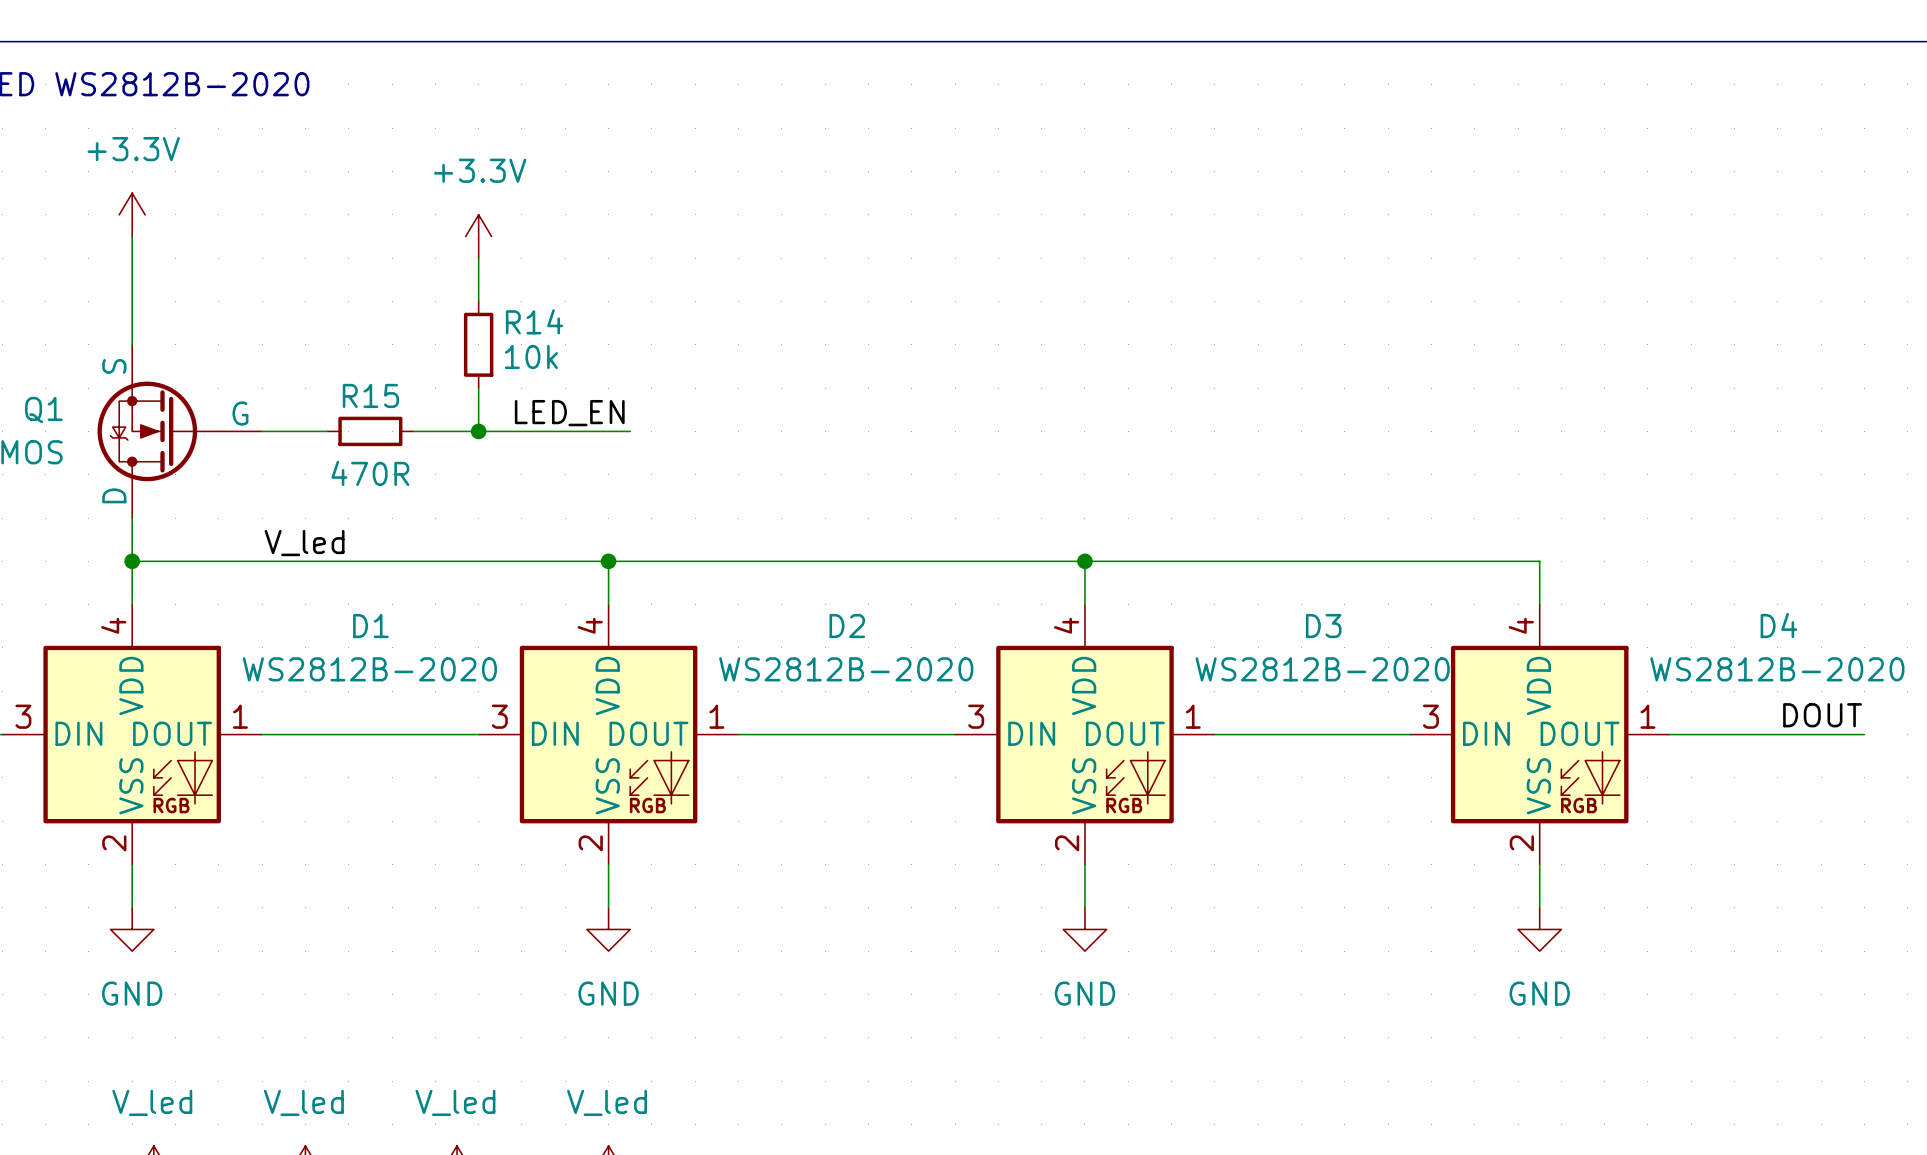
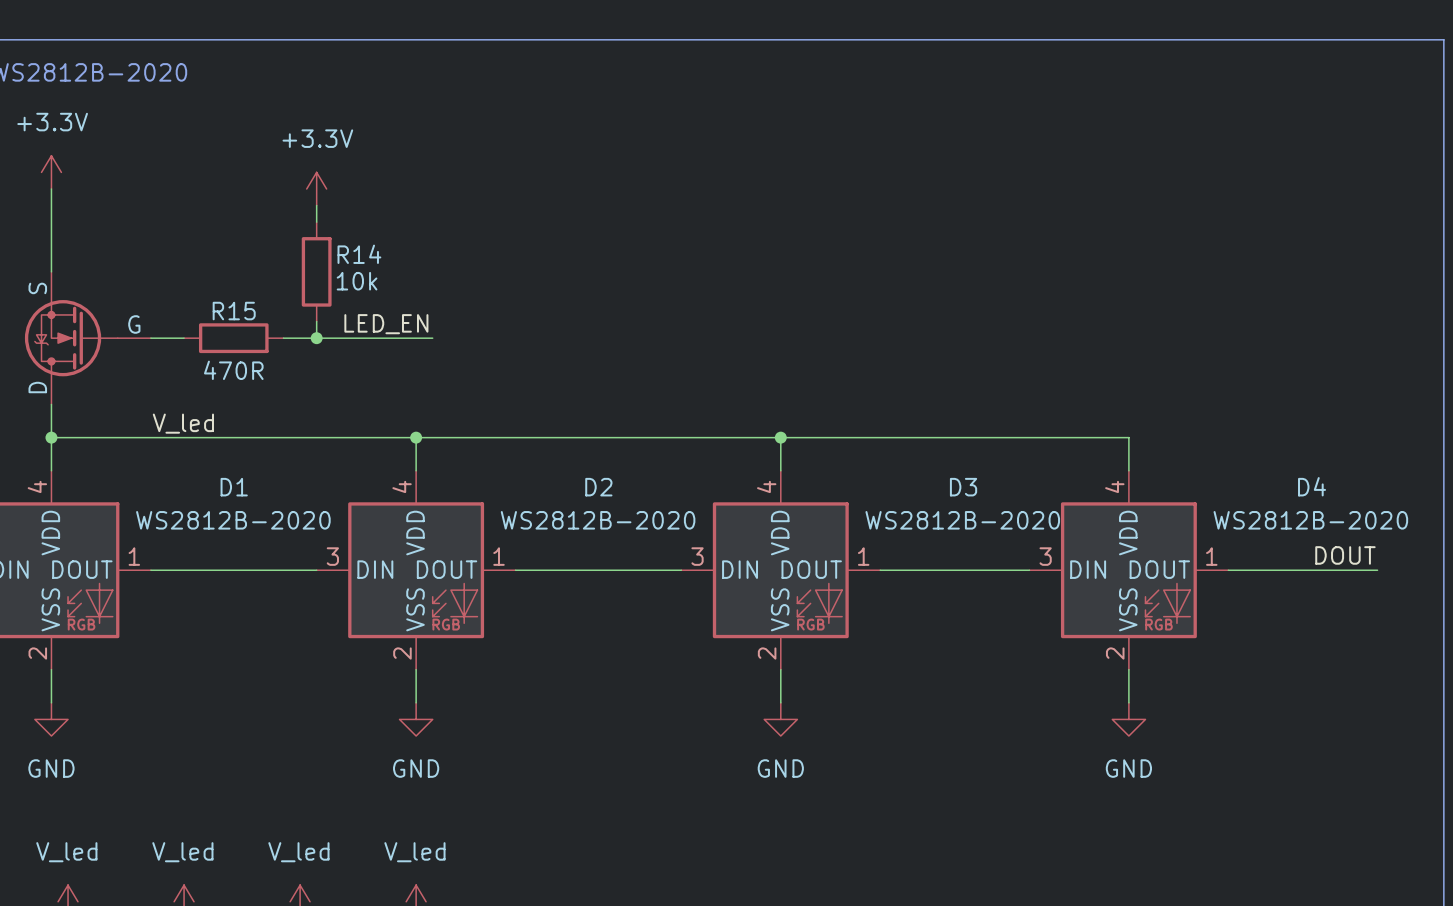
R14 symbol: [463, 301, 494, 389] -> [301, 222, 332, 322]
R15 symbol: [327, 416, 414, 447] -> [184, 323, 284, 354]

